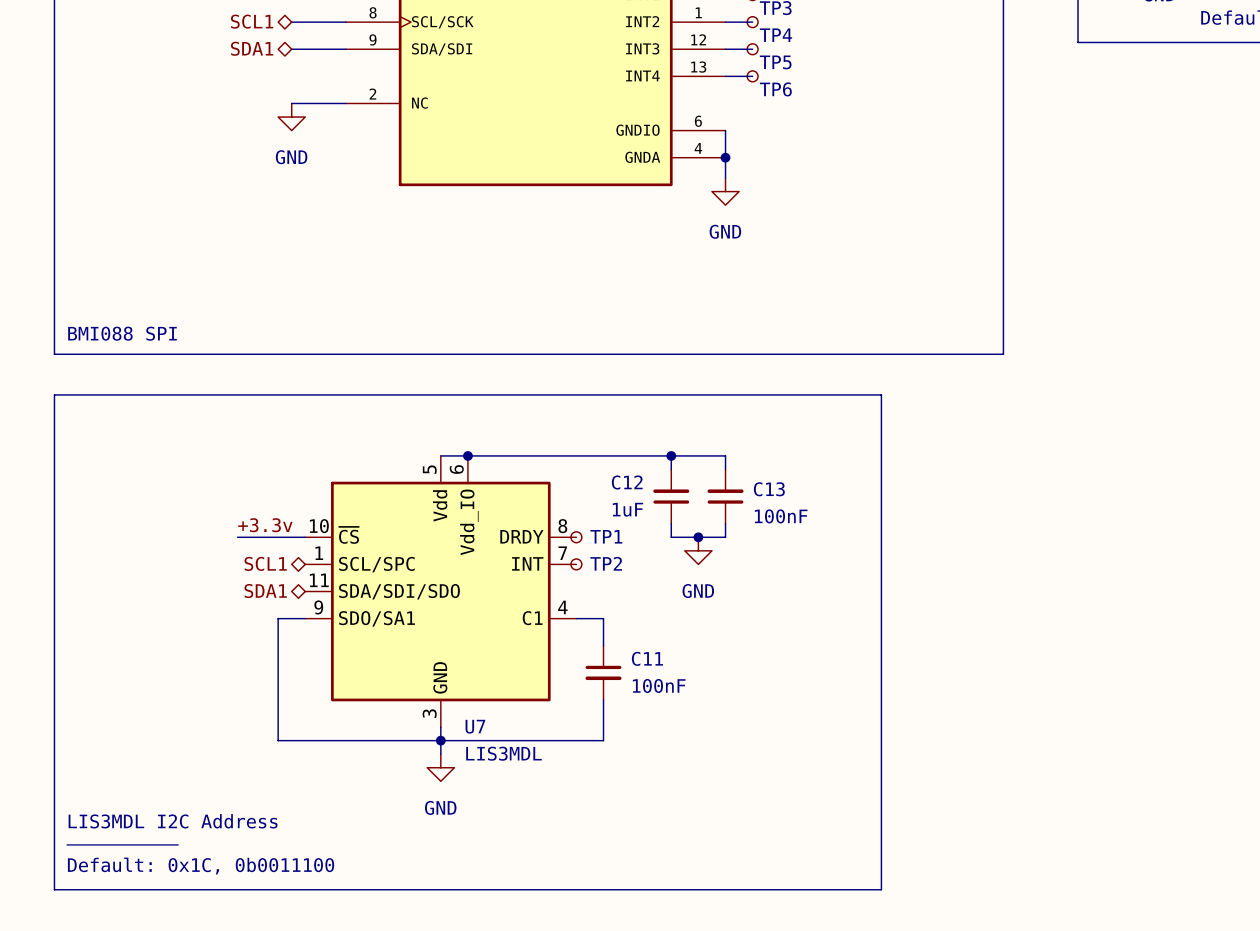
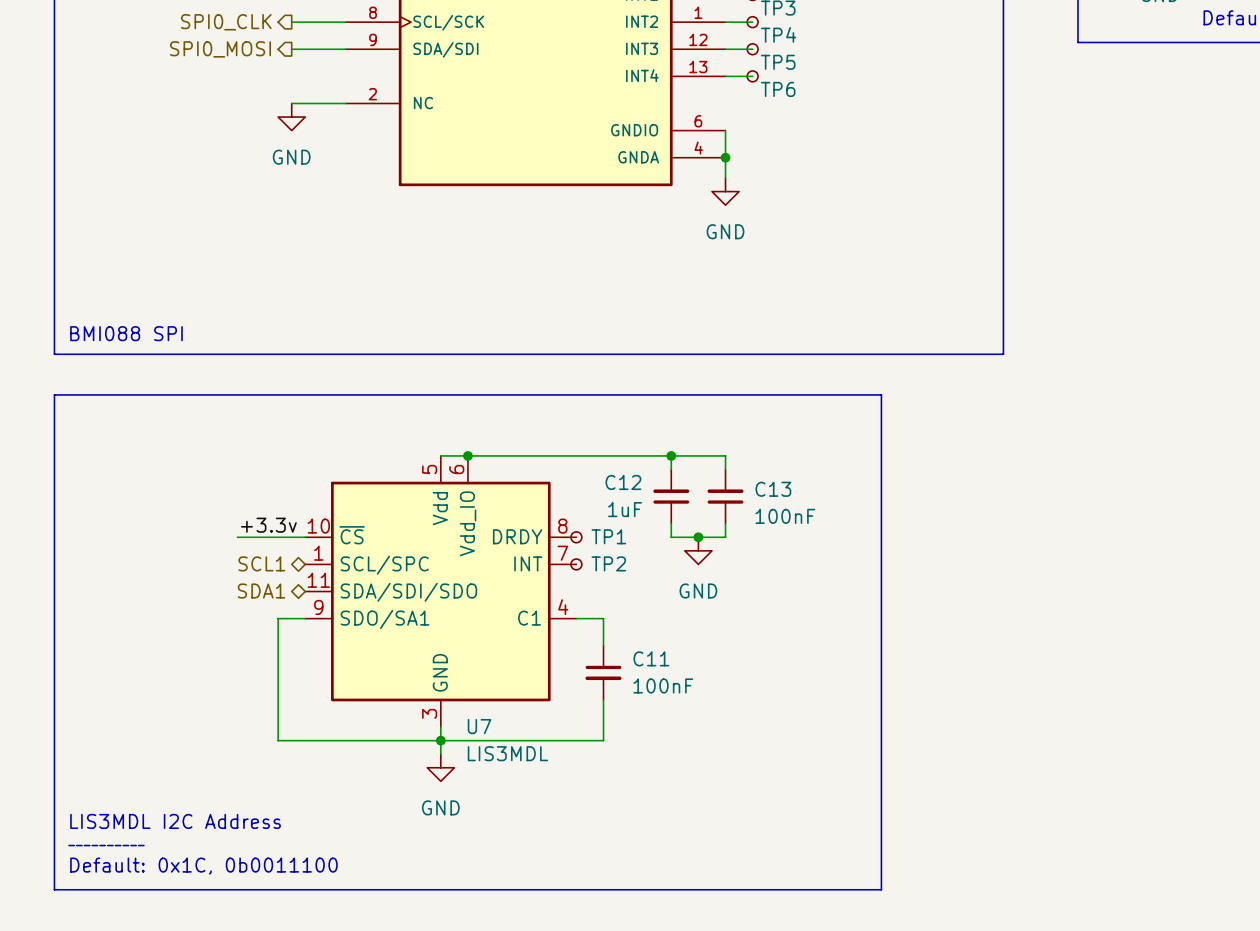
hierarchical label shape: bidirectional (252, 21) -> output (226, 22)
hierarchical label: SCL1 (252, 21) -> SPI0_CLK (226, 22)
hierarchical label shape: bidirectional (252, 48) -> output (220, 49)
hierarchical label: SDA1 (252, 48) -> SPI0_MOSI (220, 49)

